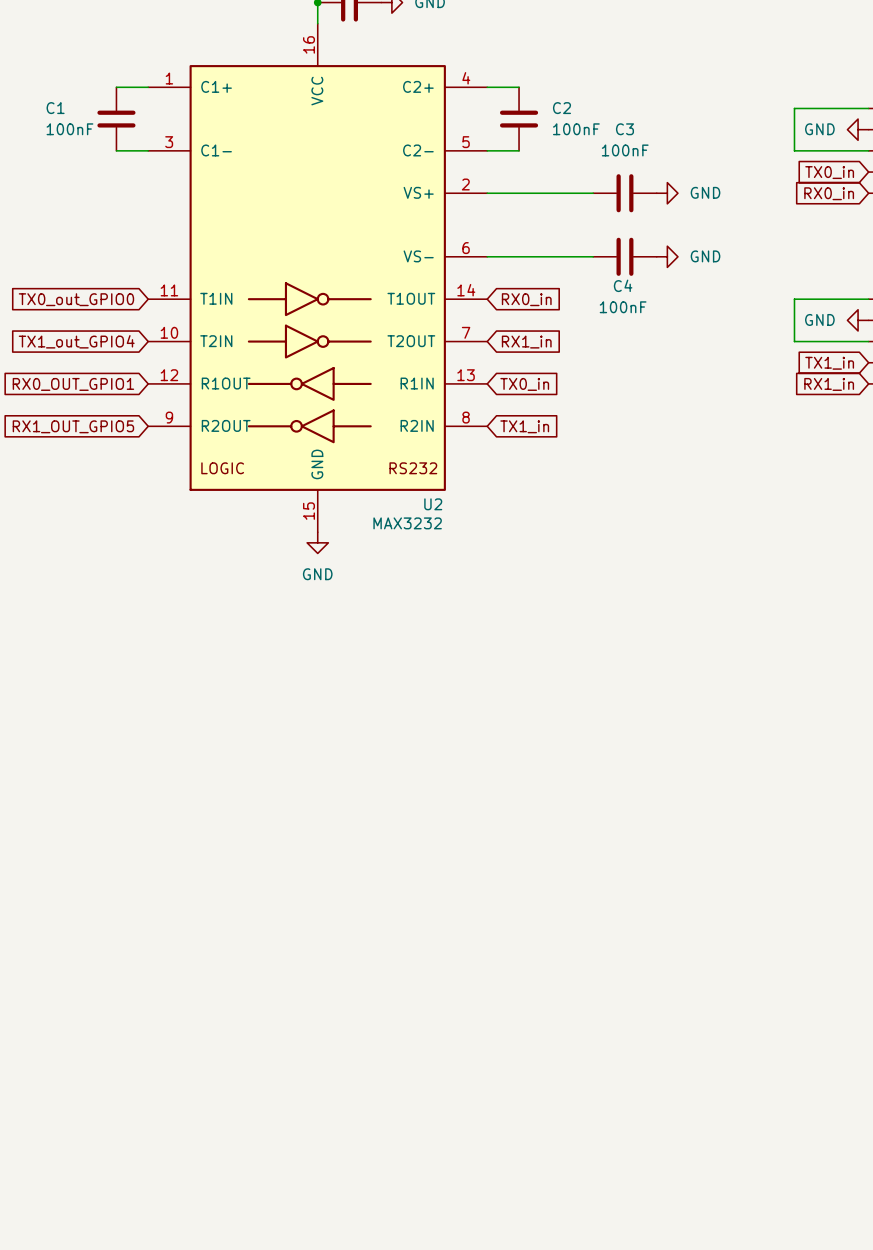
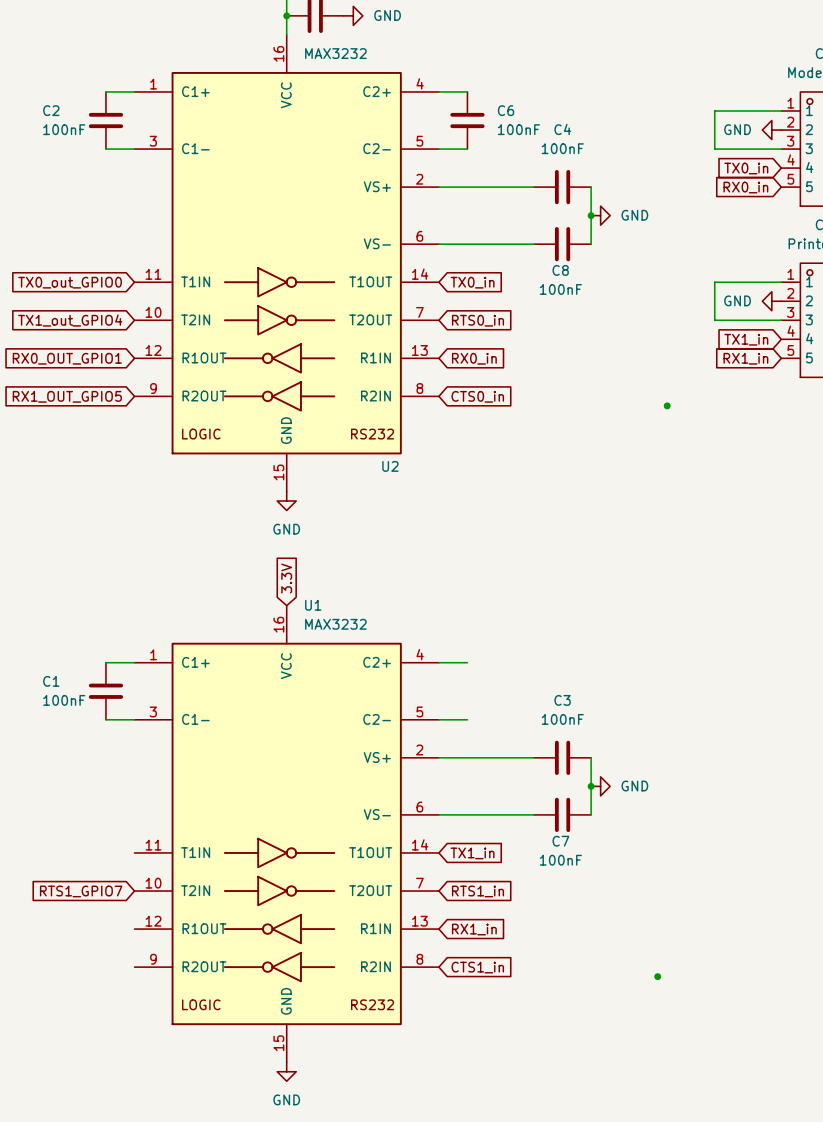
C1 name: C1 (55, 108) -> C2 (51, 110)
C2 name: C2 (561, 108) -> C6 (506, 110)
C3 name: C3 (624, 129) -> C4 (562, 129)
wire: none -> (591, 187) (591, 244)
power symbol: GND (667, 193) -> none
junction: none -> (591, 215)
power symbol: none -> GND (600, 215)
power symbol: GND (667, 256) -> none
C4 name: C4 (623, 285) -> C8 (560, 270)
global label: RX0_in (526, 299) -> TX0_in (472, 282)
global label: RX1_in (526, 342) -> RTS0_in (477, 320)
global label: TX0_in (524, 384) -> RX0_in (474, 358)
global label: TX1_in (524, 426) -> CTS0_in (477, 396)
junction: none -> (667, 405)
U2 value position: MAX3232 (407, 523) -> MAX3232 (335, 53)
global label: none -> 3.3V (286, 578)
wire: none -> (105, 662) (134, 662)
wire: none -> (438, 662) (467, 662)
C1: none -> 100nF (105, 691)
wire: none -> (105, 719) (134, 719)
wire: none -> (438, 719) (467, 719)
wire: none -> (438, 757) (534, 757)
C3: none -> 100nF (562, 757)
wire: none -> (591, 757) (591, 814)
junction: none -> (591, 786)
power symbol: none -> GND (600, 786)
wire: none -> (438, 814) (534, 814)
C7: none -> 100nF (562, 814)
U1: none -> MAX3232 (286, 833)
global label: none -> TX1_in (472, 853)
global label: none -> RTS1_GPIO7 (81, 891)
global label: none -> RTS1_in (477, 891)
global label: none -> RX1_in (474, 929)
global label: none -> CTS1_in (477, 967)
junction: none -> (657, 976)
power symbol: none -> GND (286, 1071)

